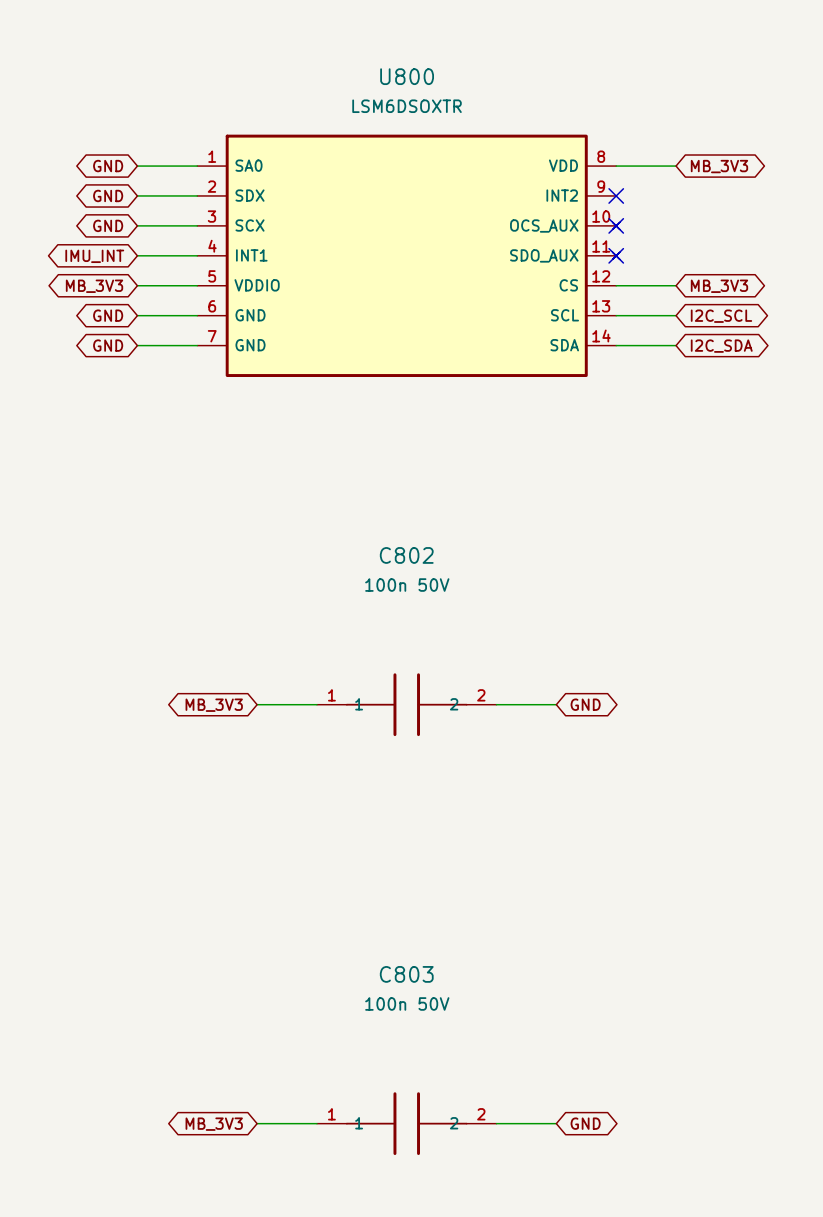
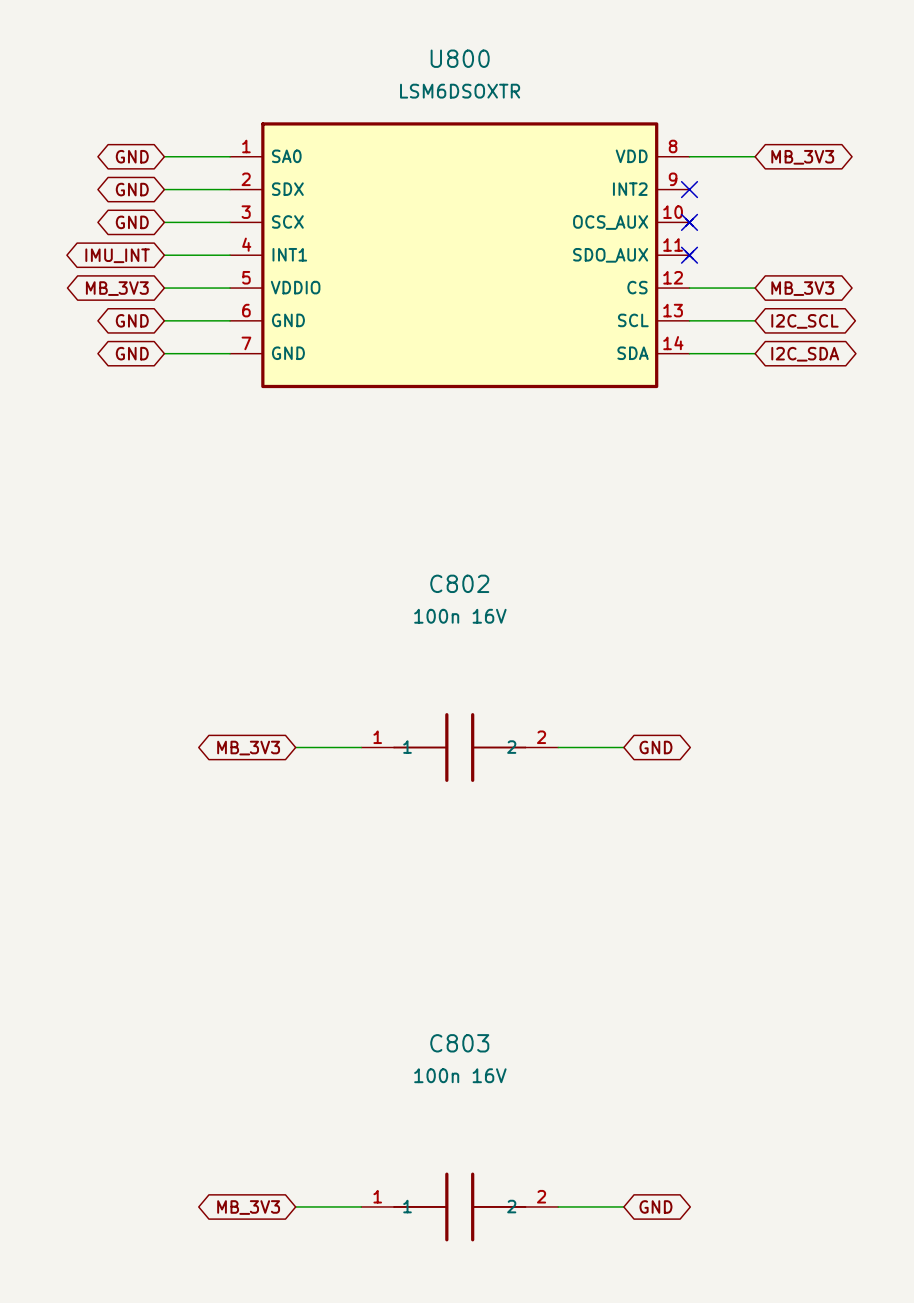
C802 value: 100n 50V (407, 585) -> 100n 16V (460, 616)
C803 value: 100n 50V (407, 1003) -> 100n 16V (460, 1075)

